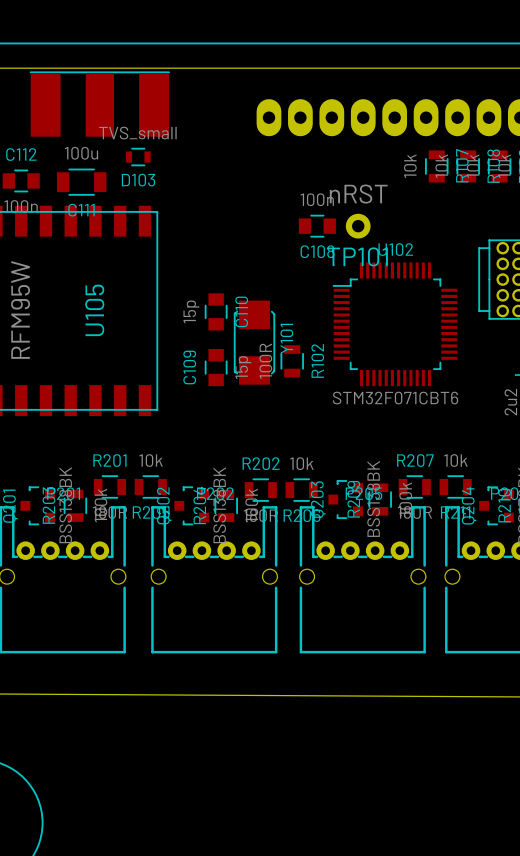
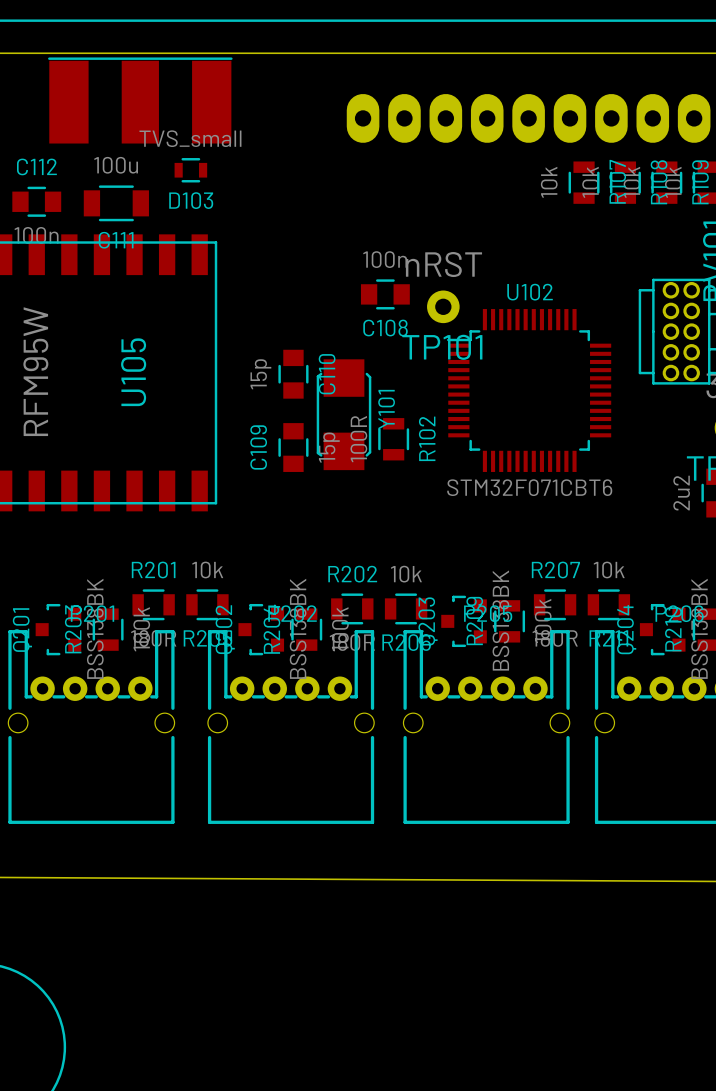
C108 position: (317, 226) -> (385, 294)
TP101 position: (358, 226) -> (443, 306)

